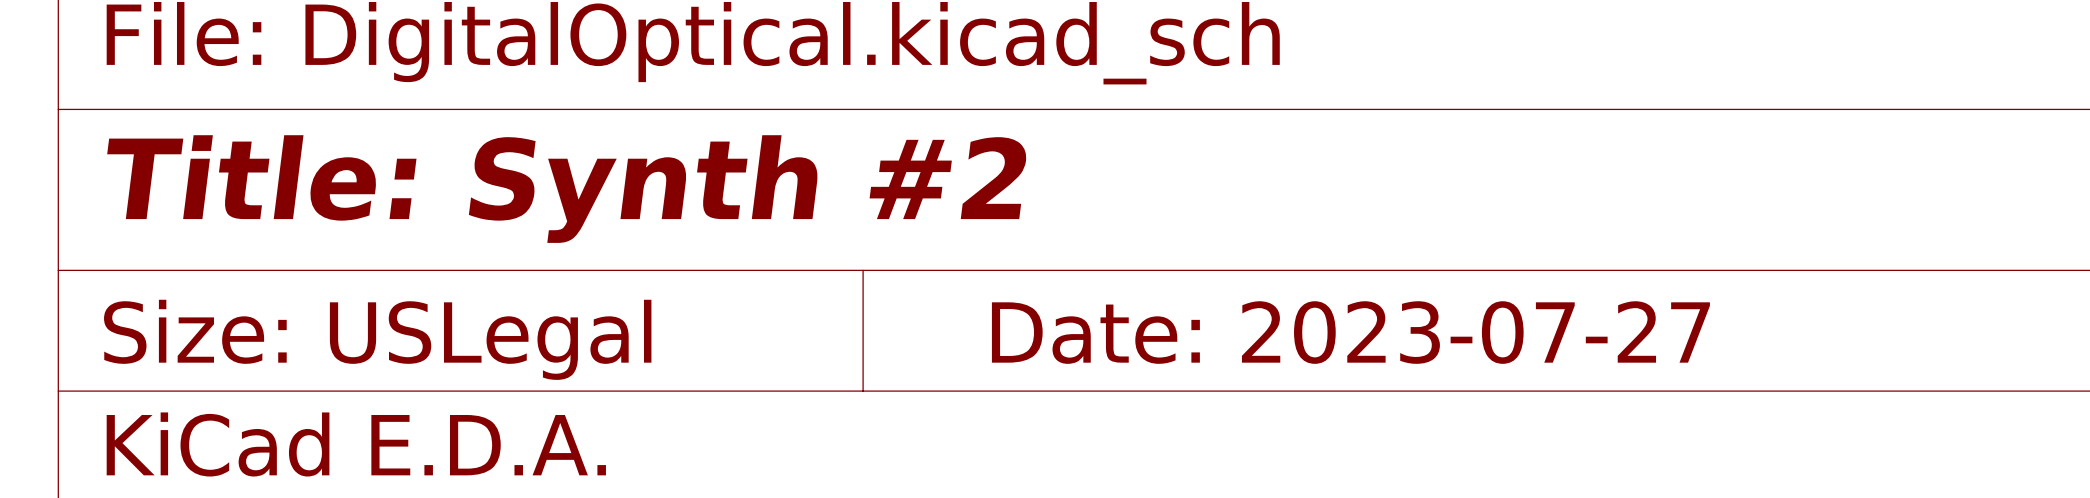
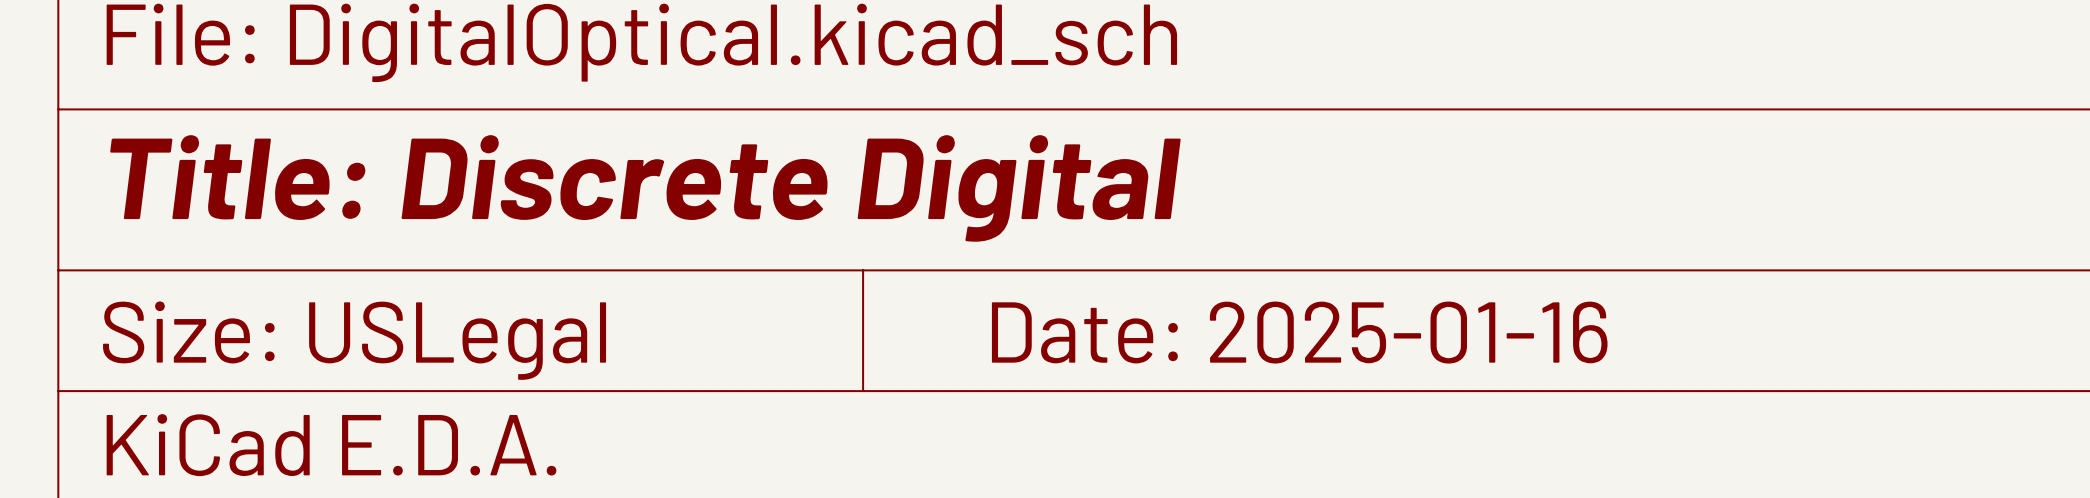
title block: Title: Synth #2 (567, 189) -> Title: Discrete Digital (645, 188)
title block: Date: 2023-07-27 (1350, 332) -> Date: 2025-01-16 (1299, 332)

